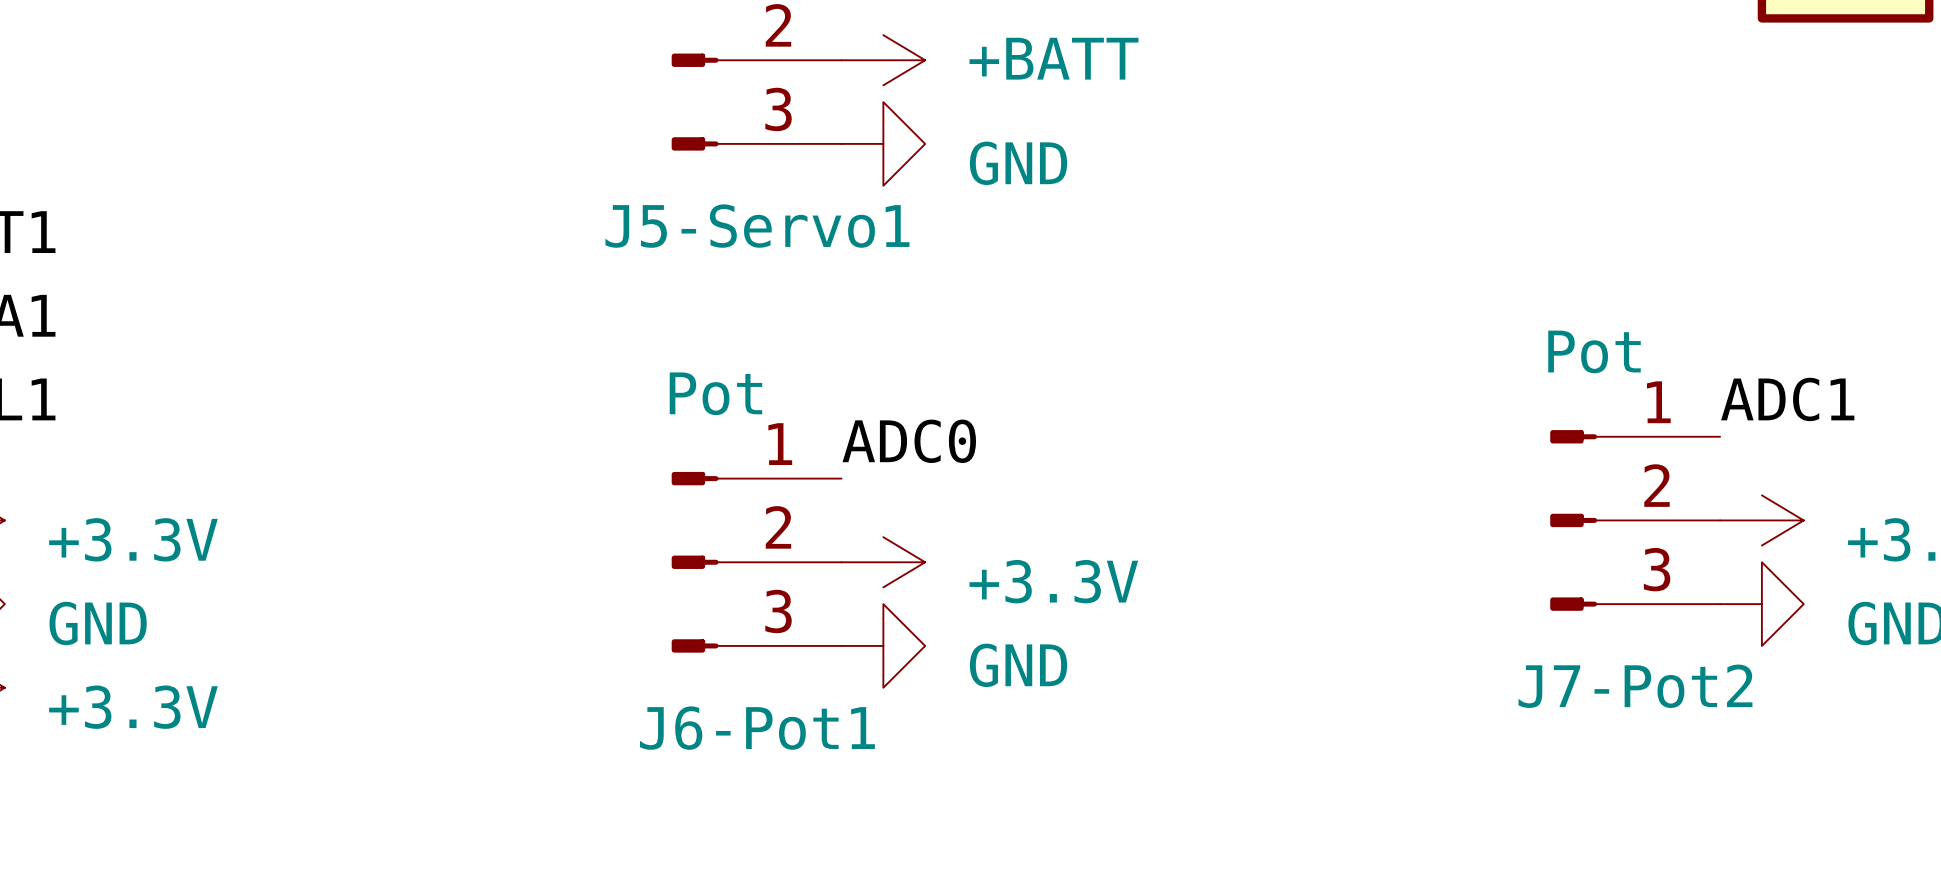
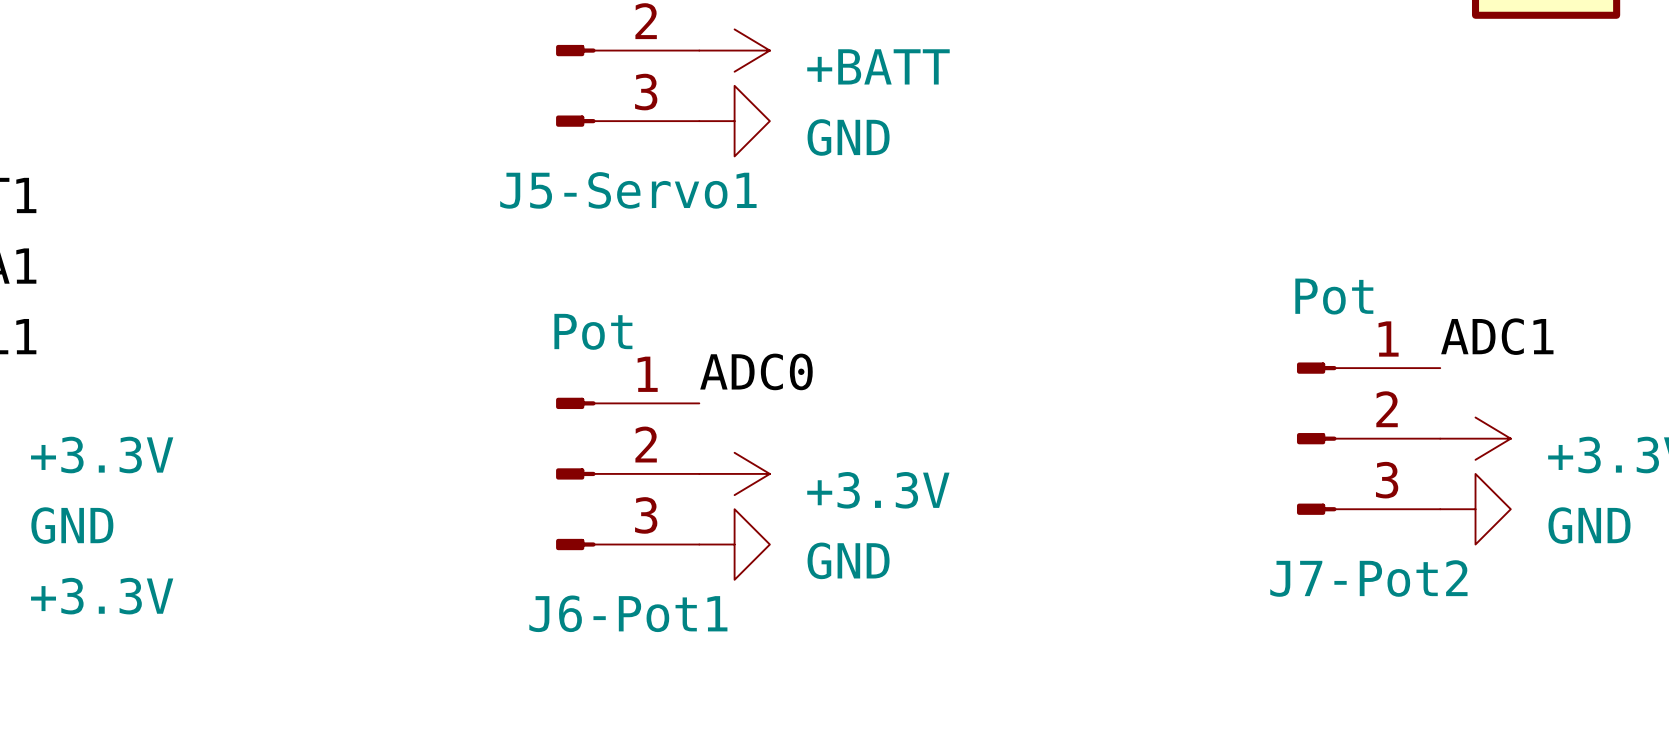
power symbol text position: +BATT (1053, 58) -> +BATT (878, 66)

